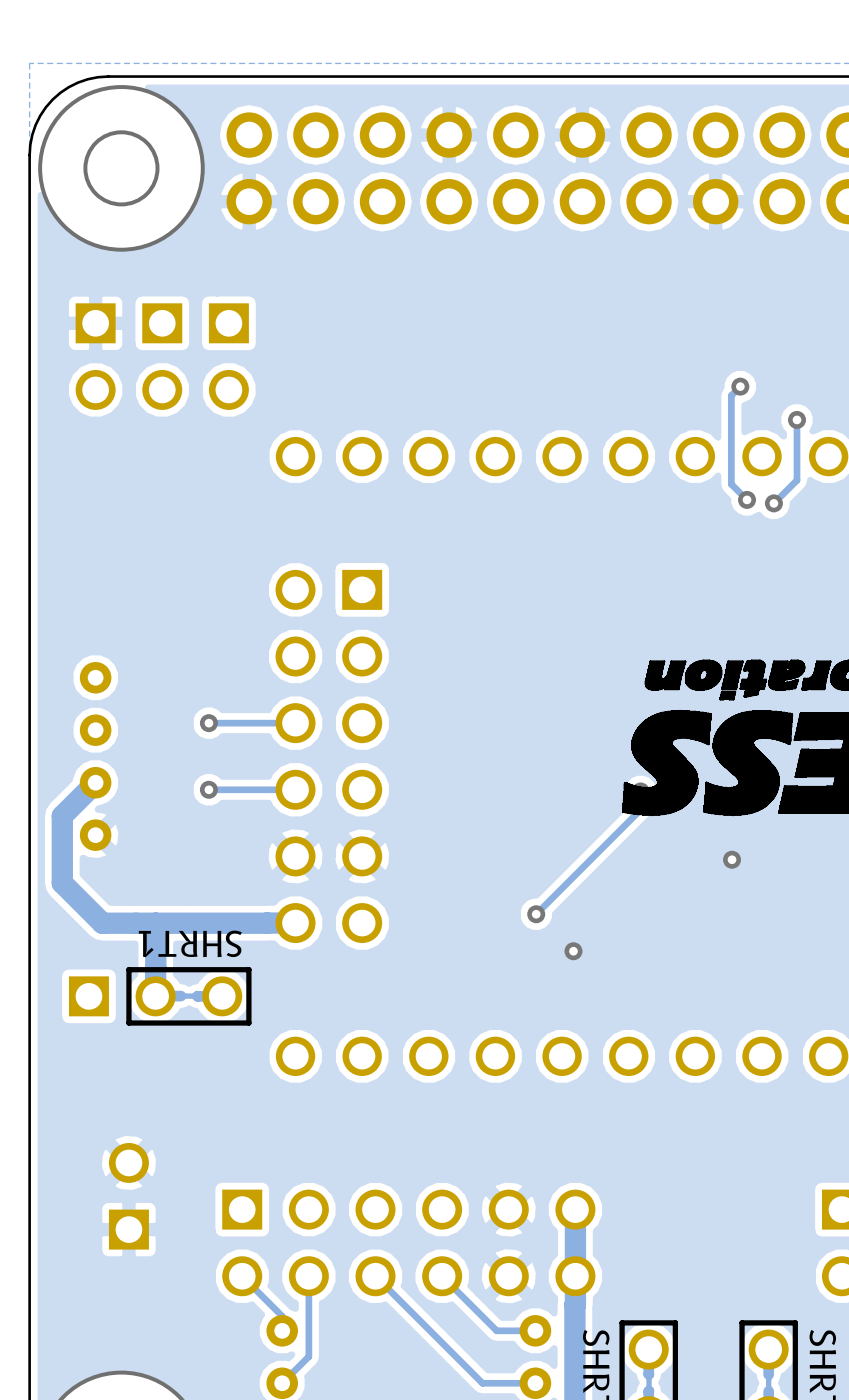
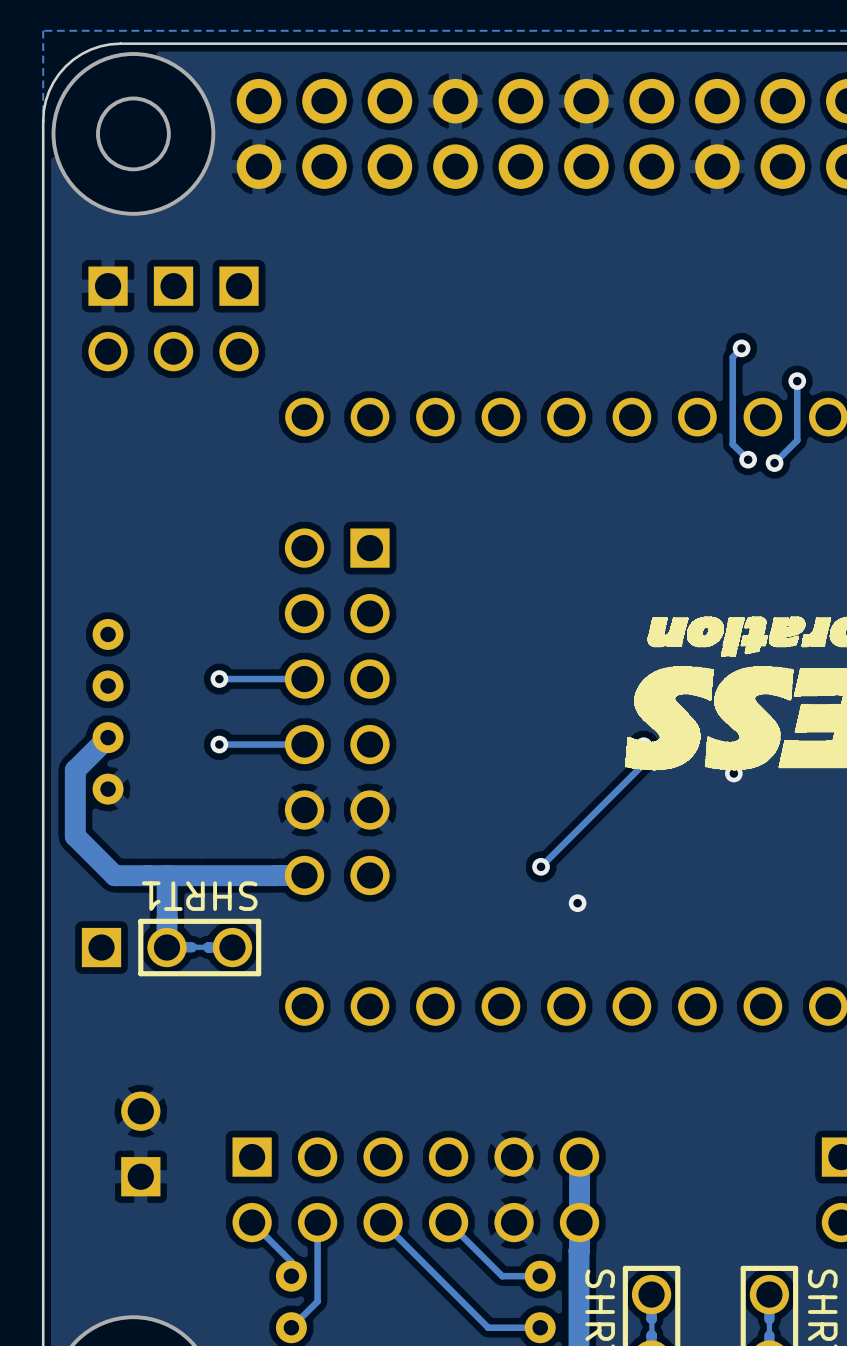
via position: (732, 859) -> (733, 773)

